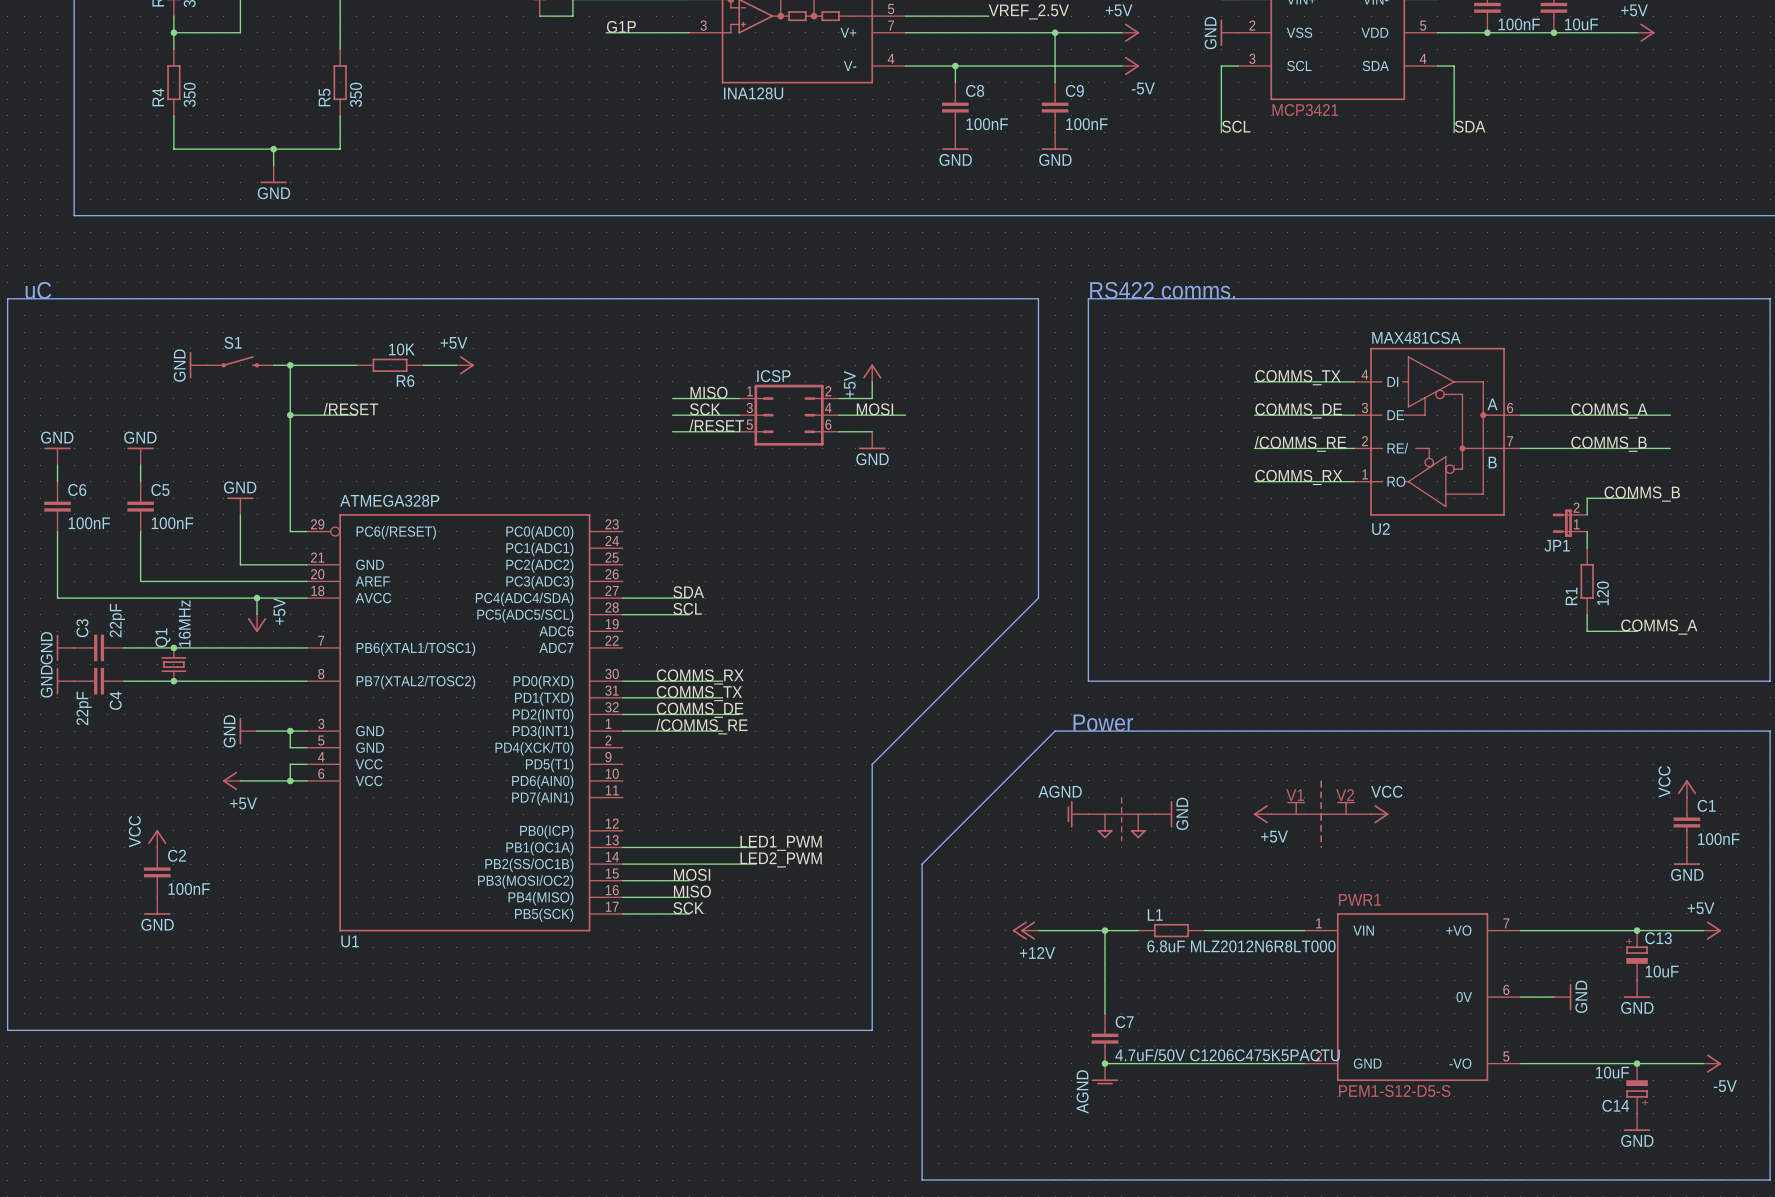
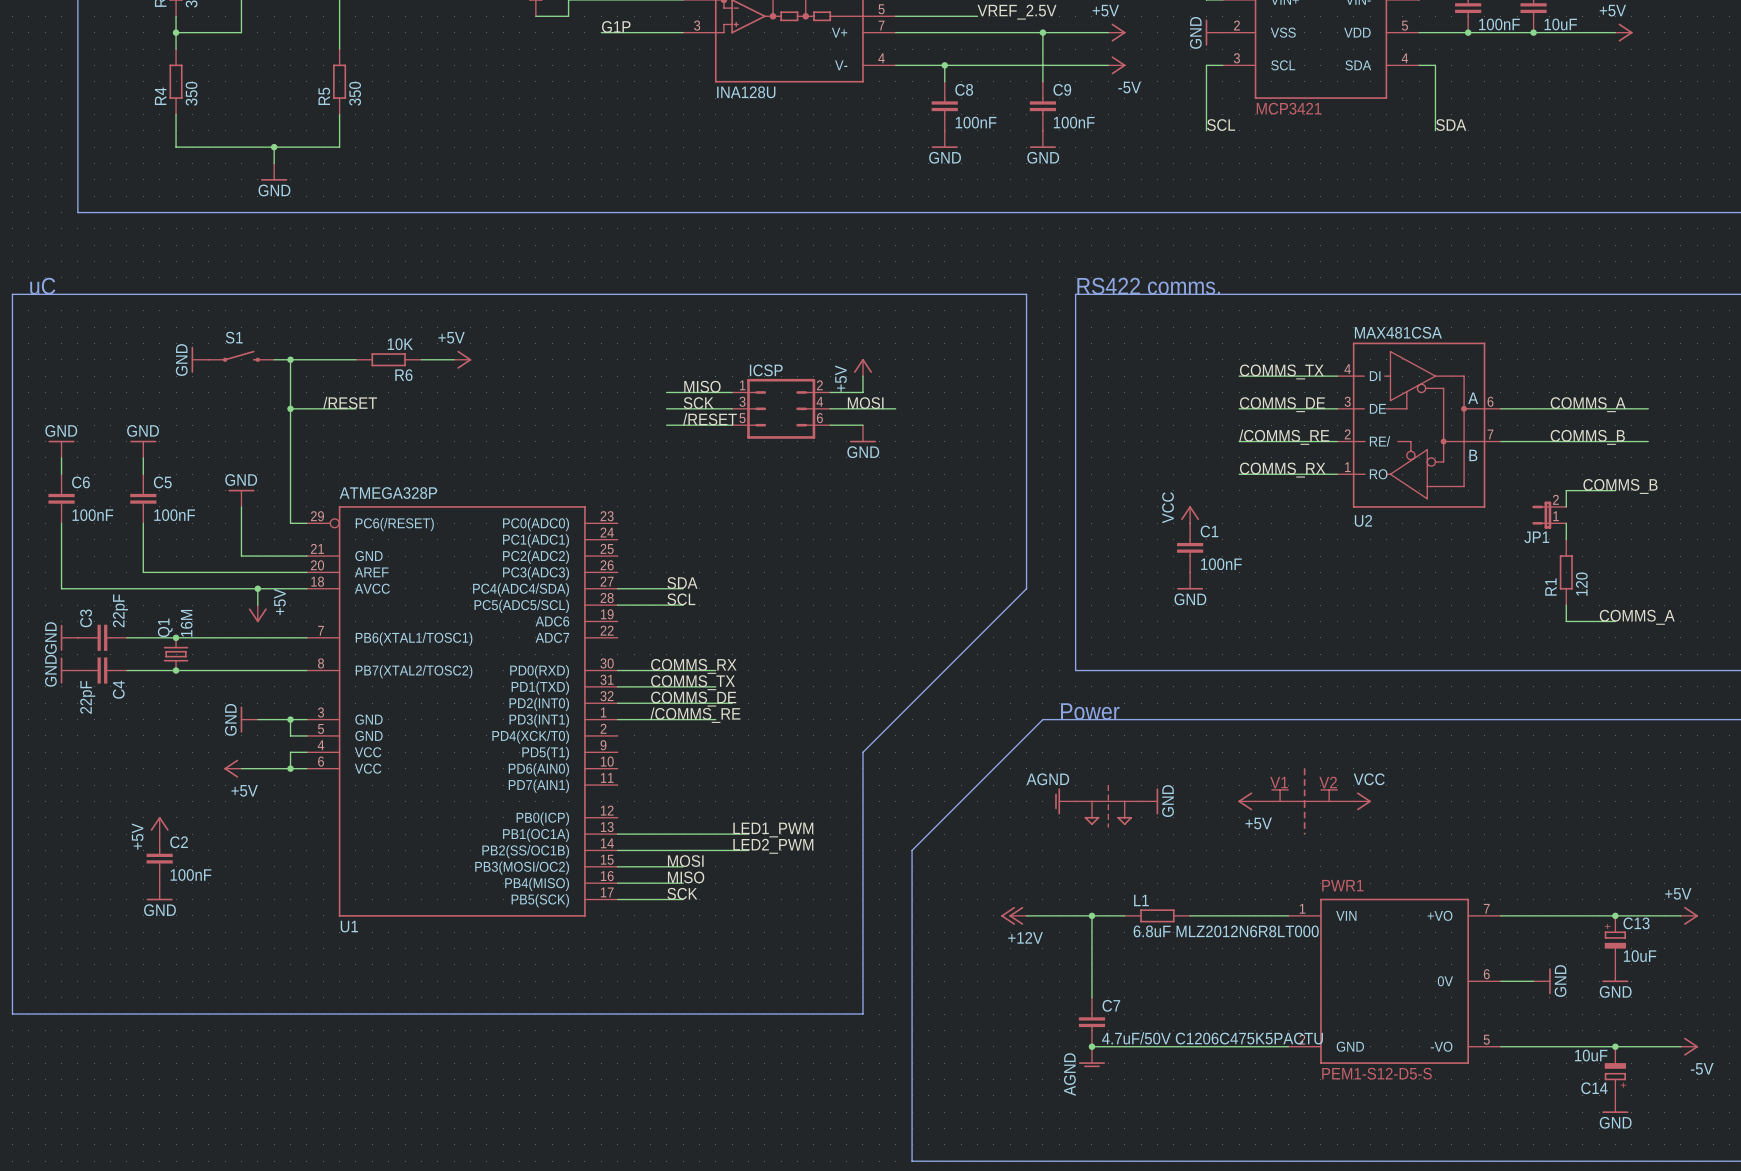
power symbol: none -> VCC (1190, 514)
power symbol: none -> GND (1190, 580)
Q1 value: 16MHz (184, 623) -> 16M (186, 623)
power symbol: VCC (1686, 788) -> none
C1 position: (1686, 822) -> (1190, 547)
power symbol: VCC (157, 838) -> +5V (159, 825)
power symbol: GND (1686, 856) -> none

